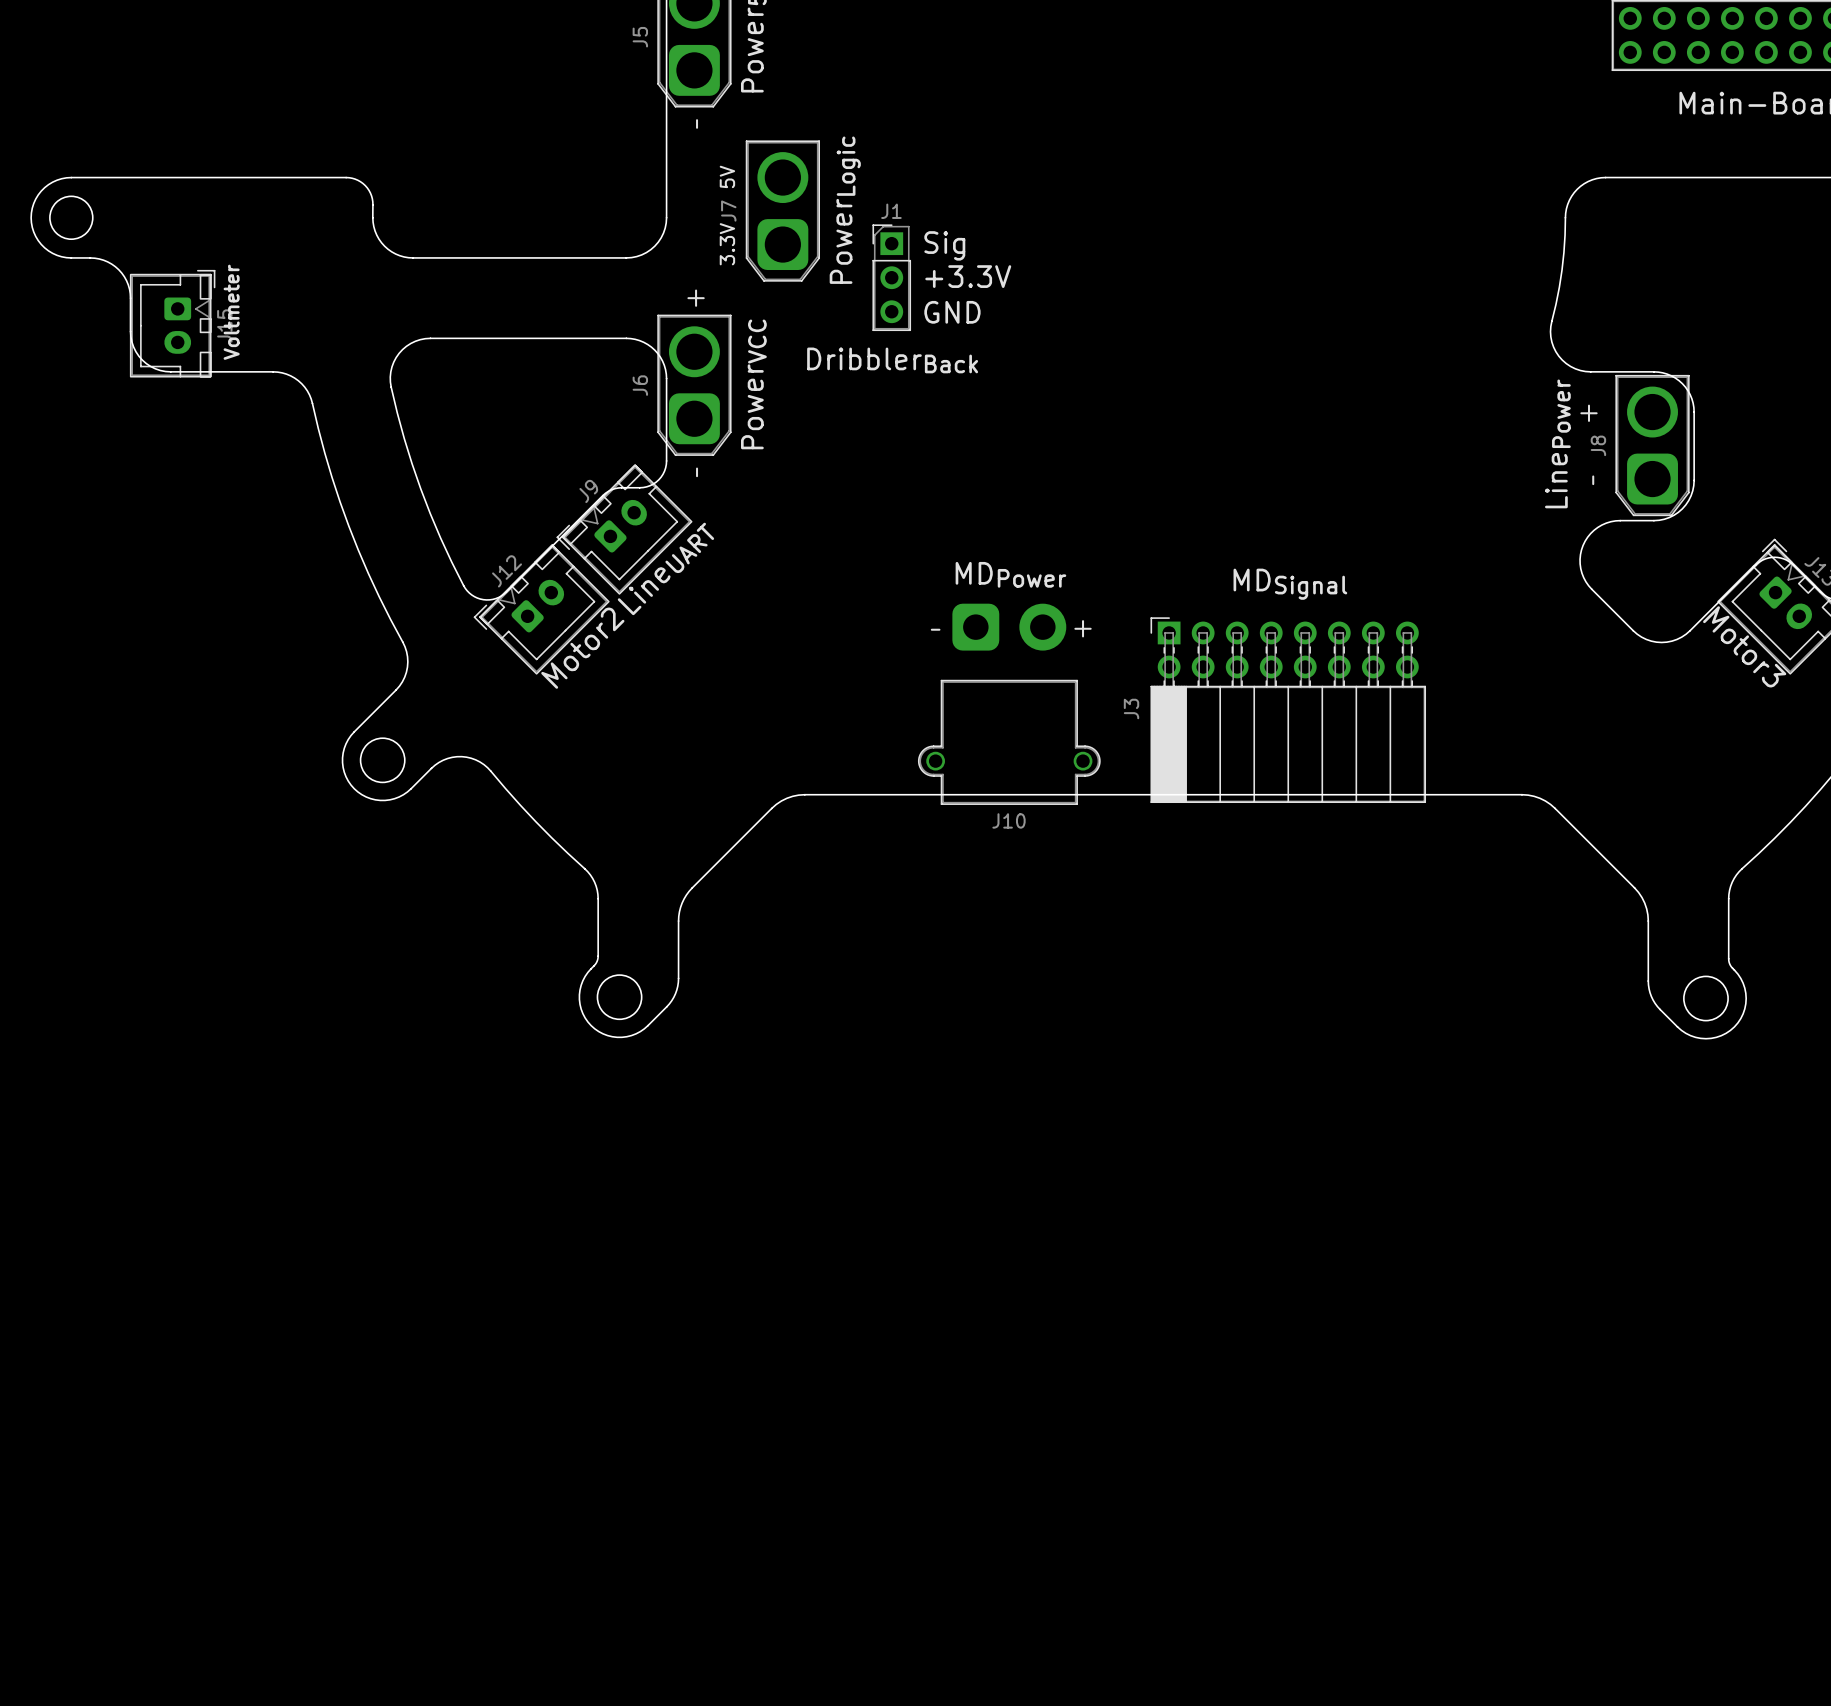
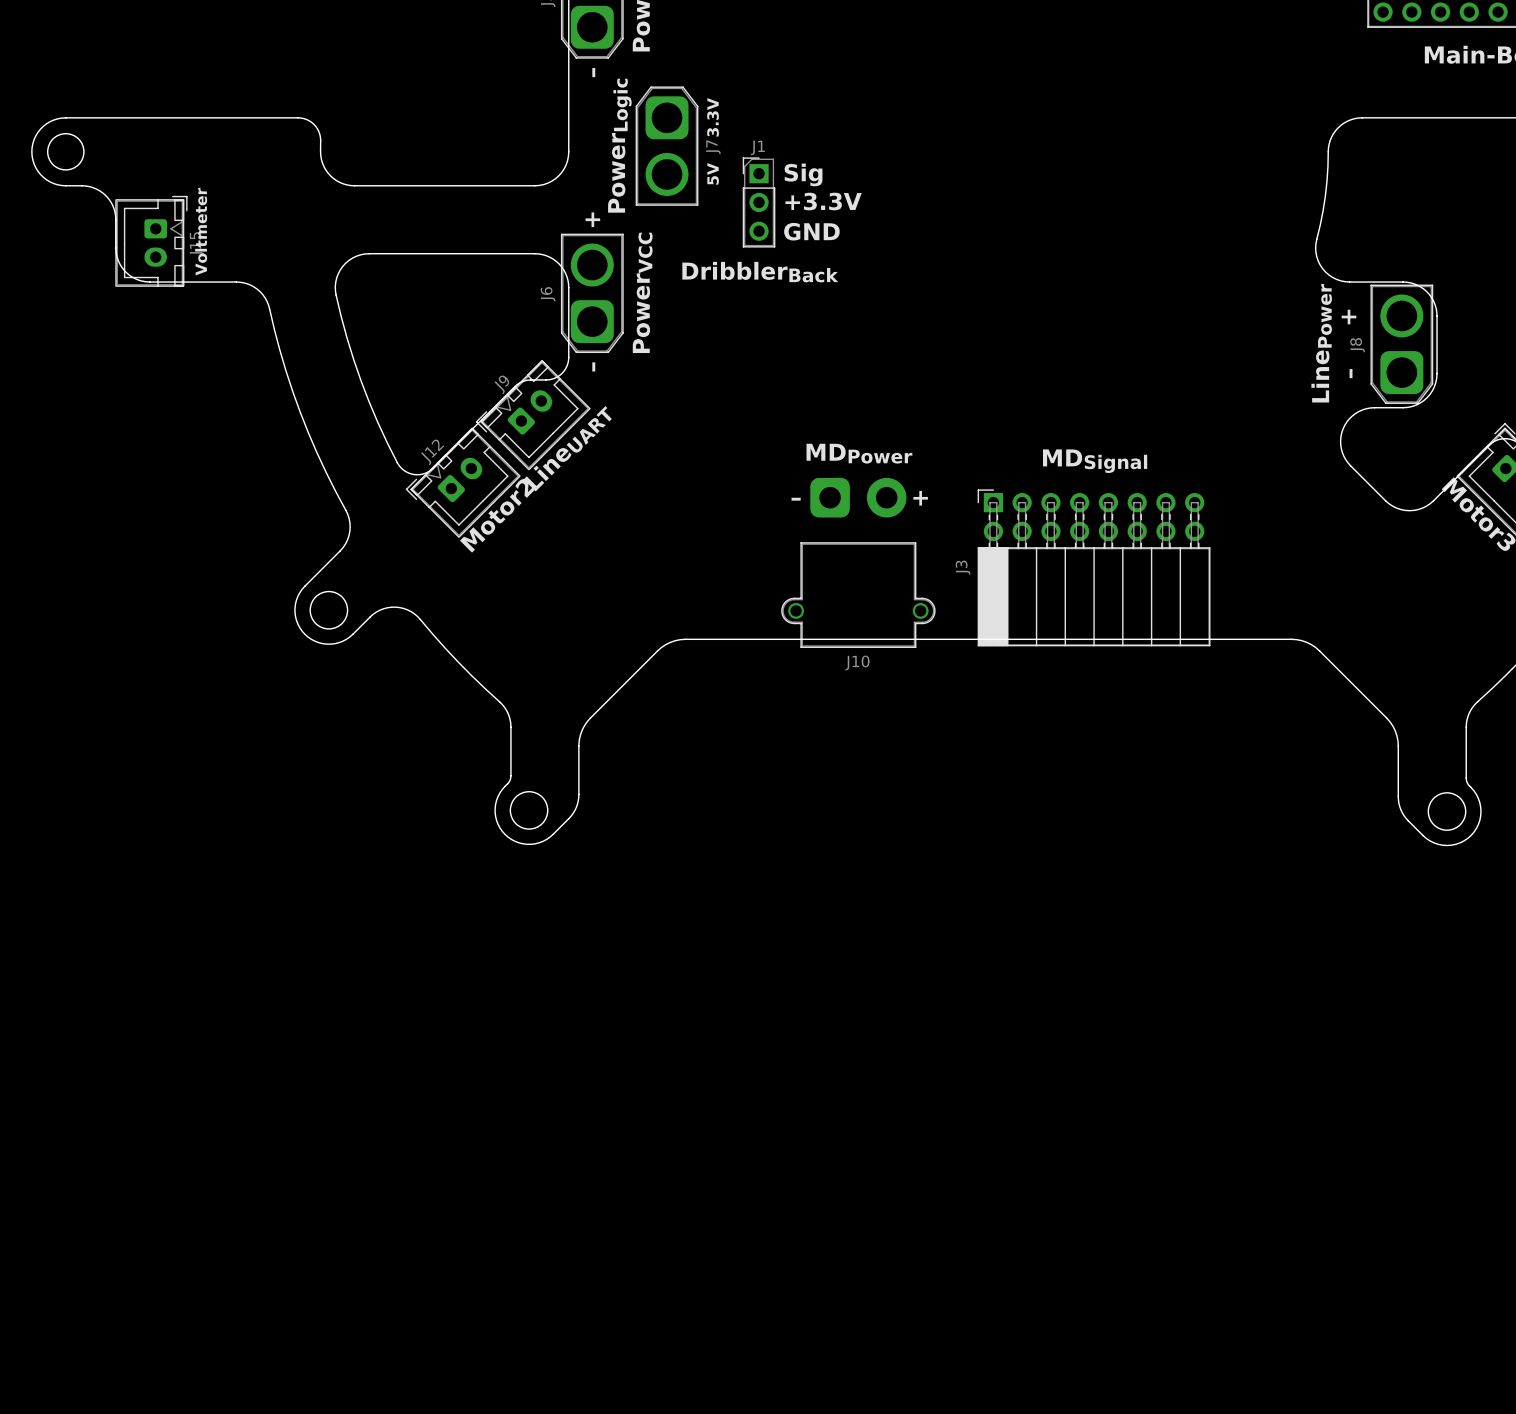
J7 rotation: 0° (782, 211) -> 180° (667, 146)

